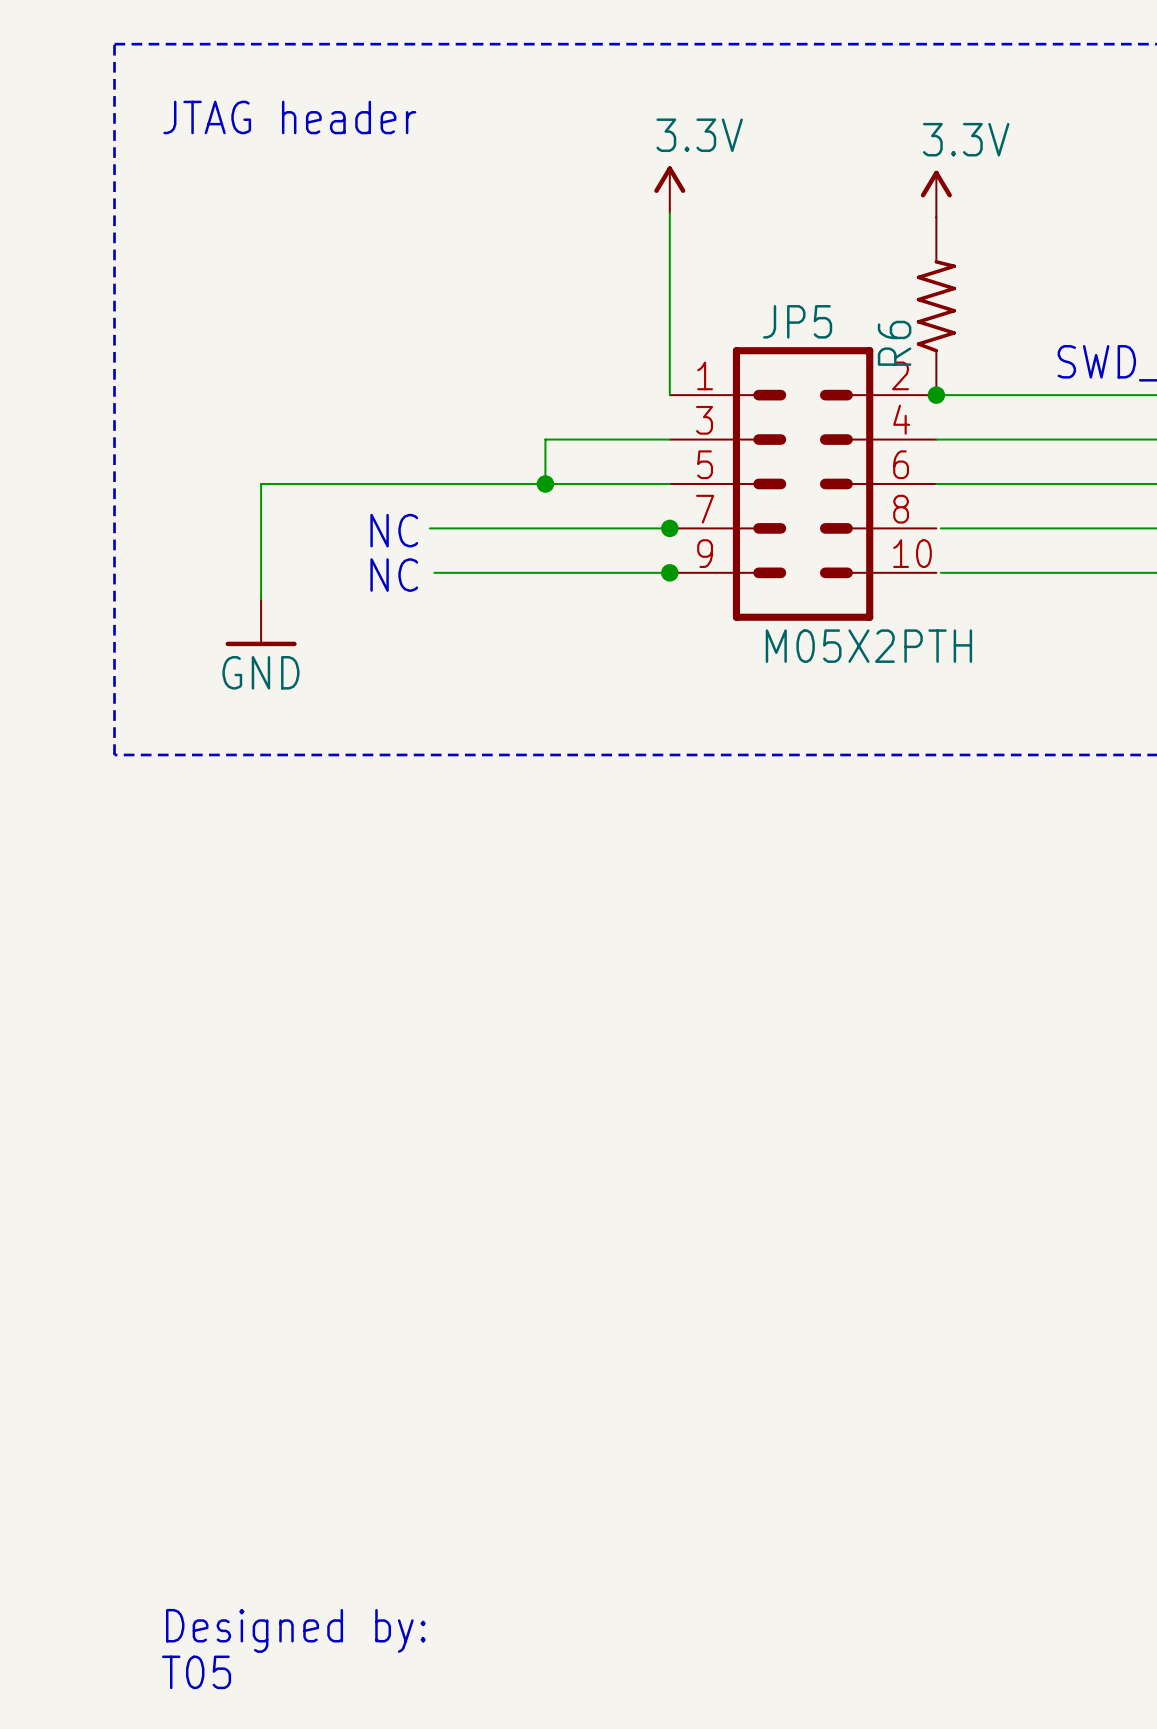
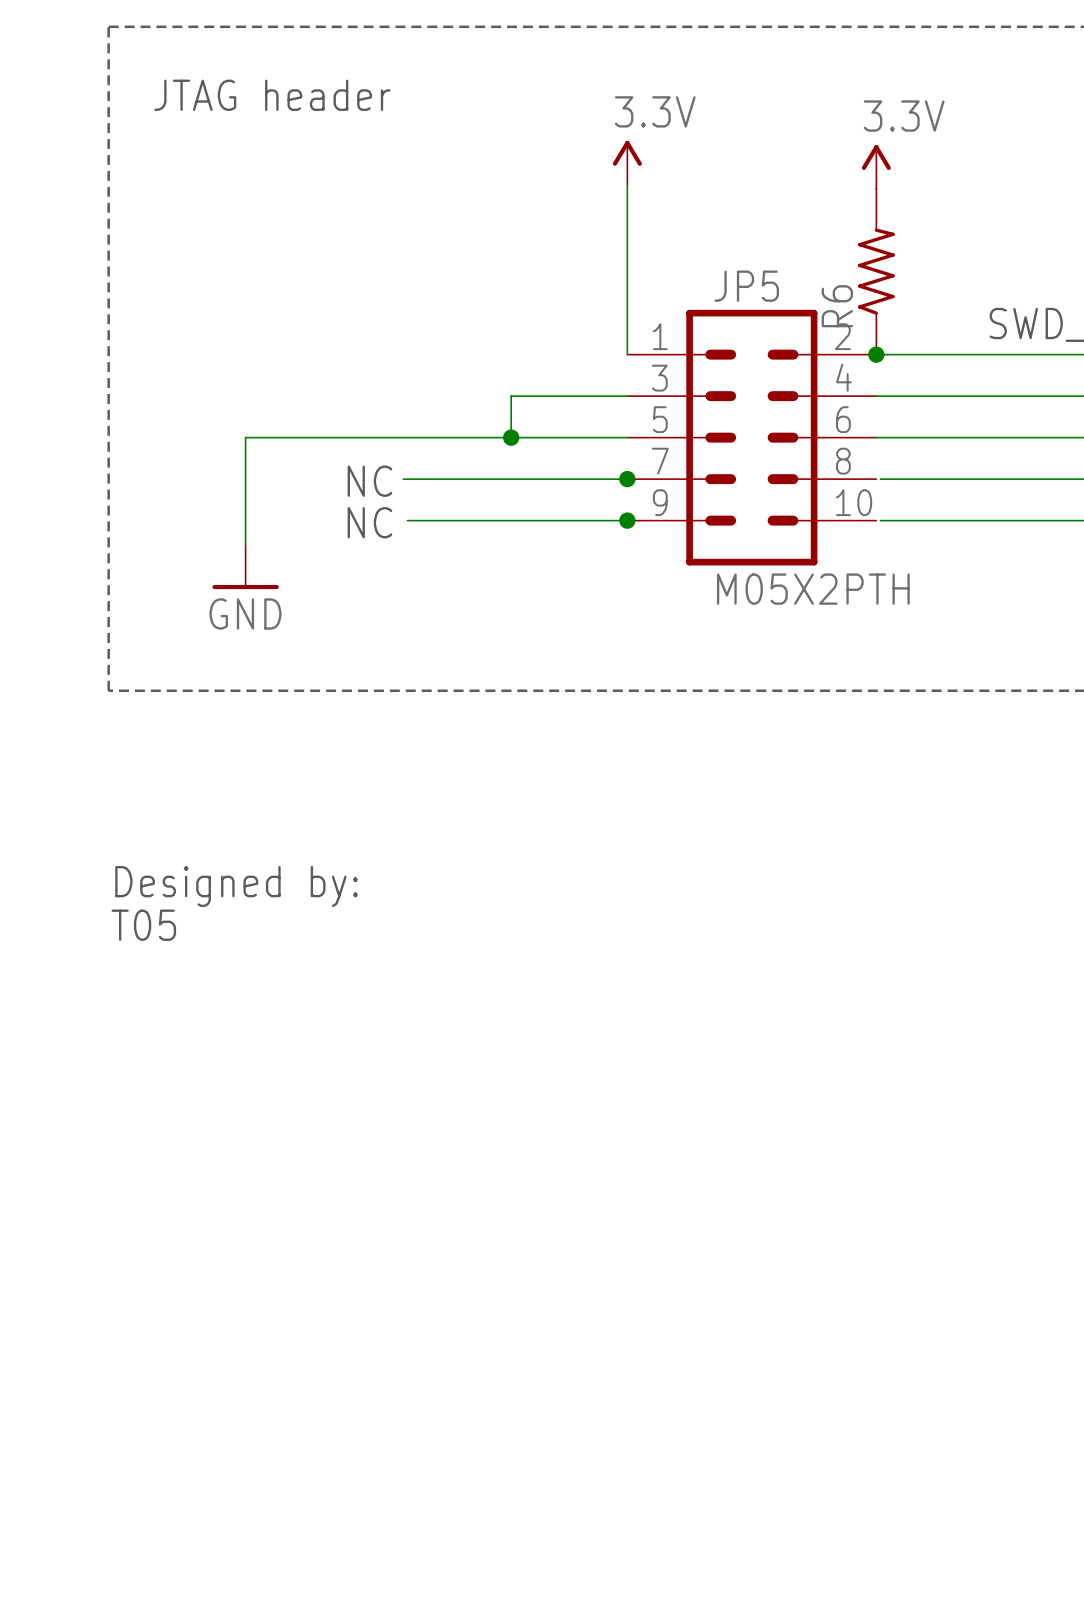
text: none -> Designed by: (236, 886)
text: none -> T05 (143, 925)
text: Designed by: (295, 1630) -> none
text: T05 (196, 1672) -> none

